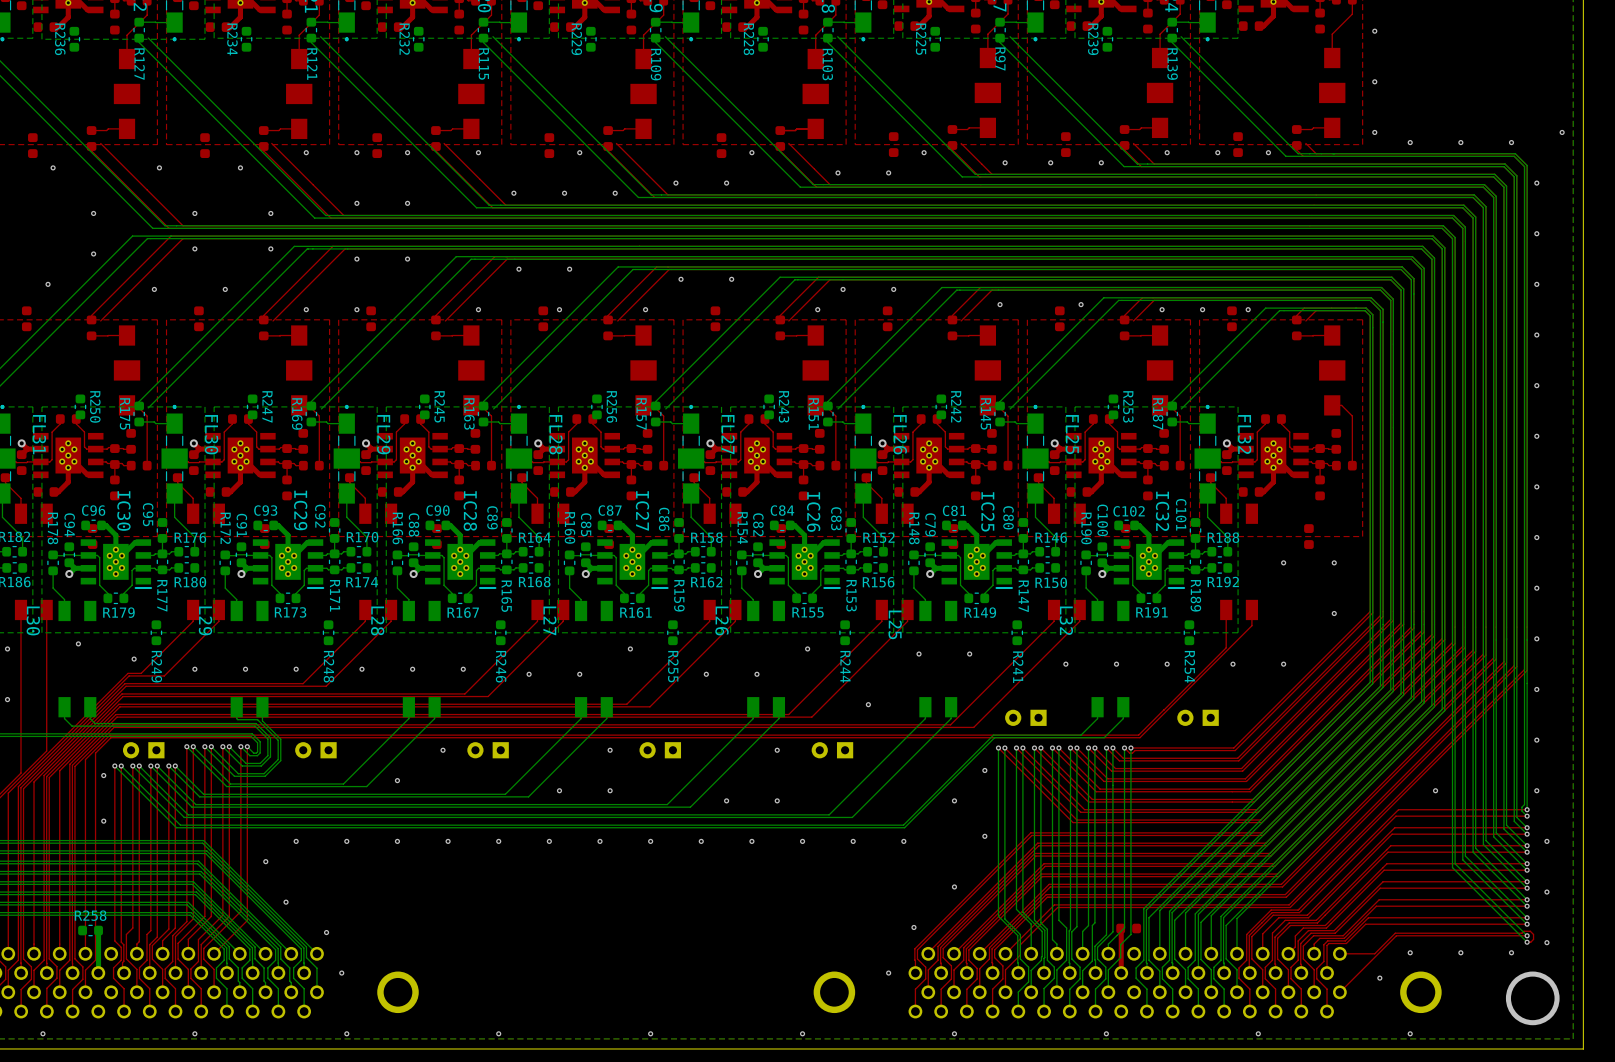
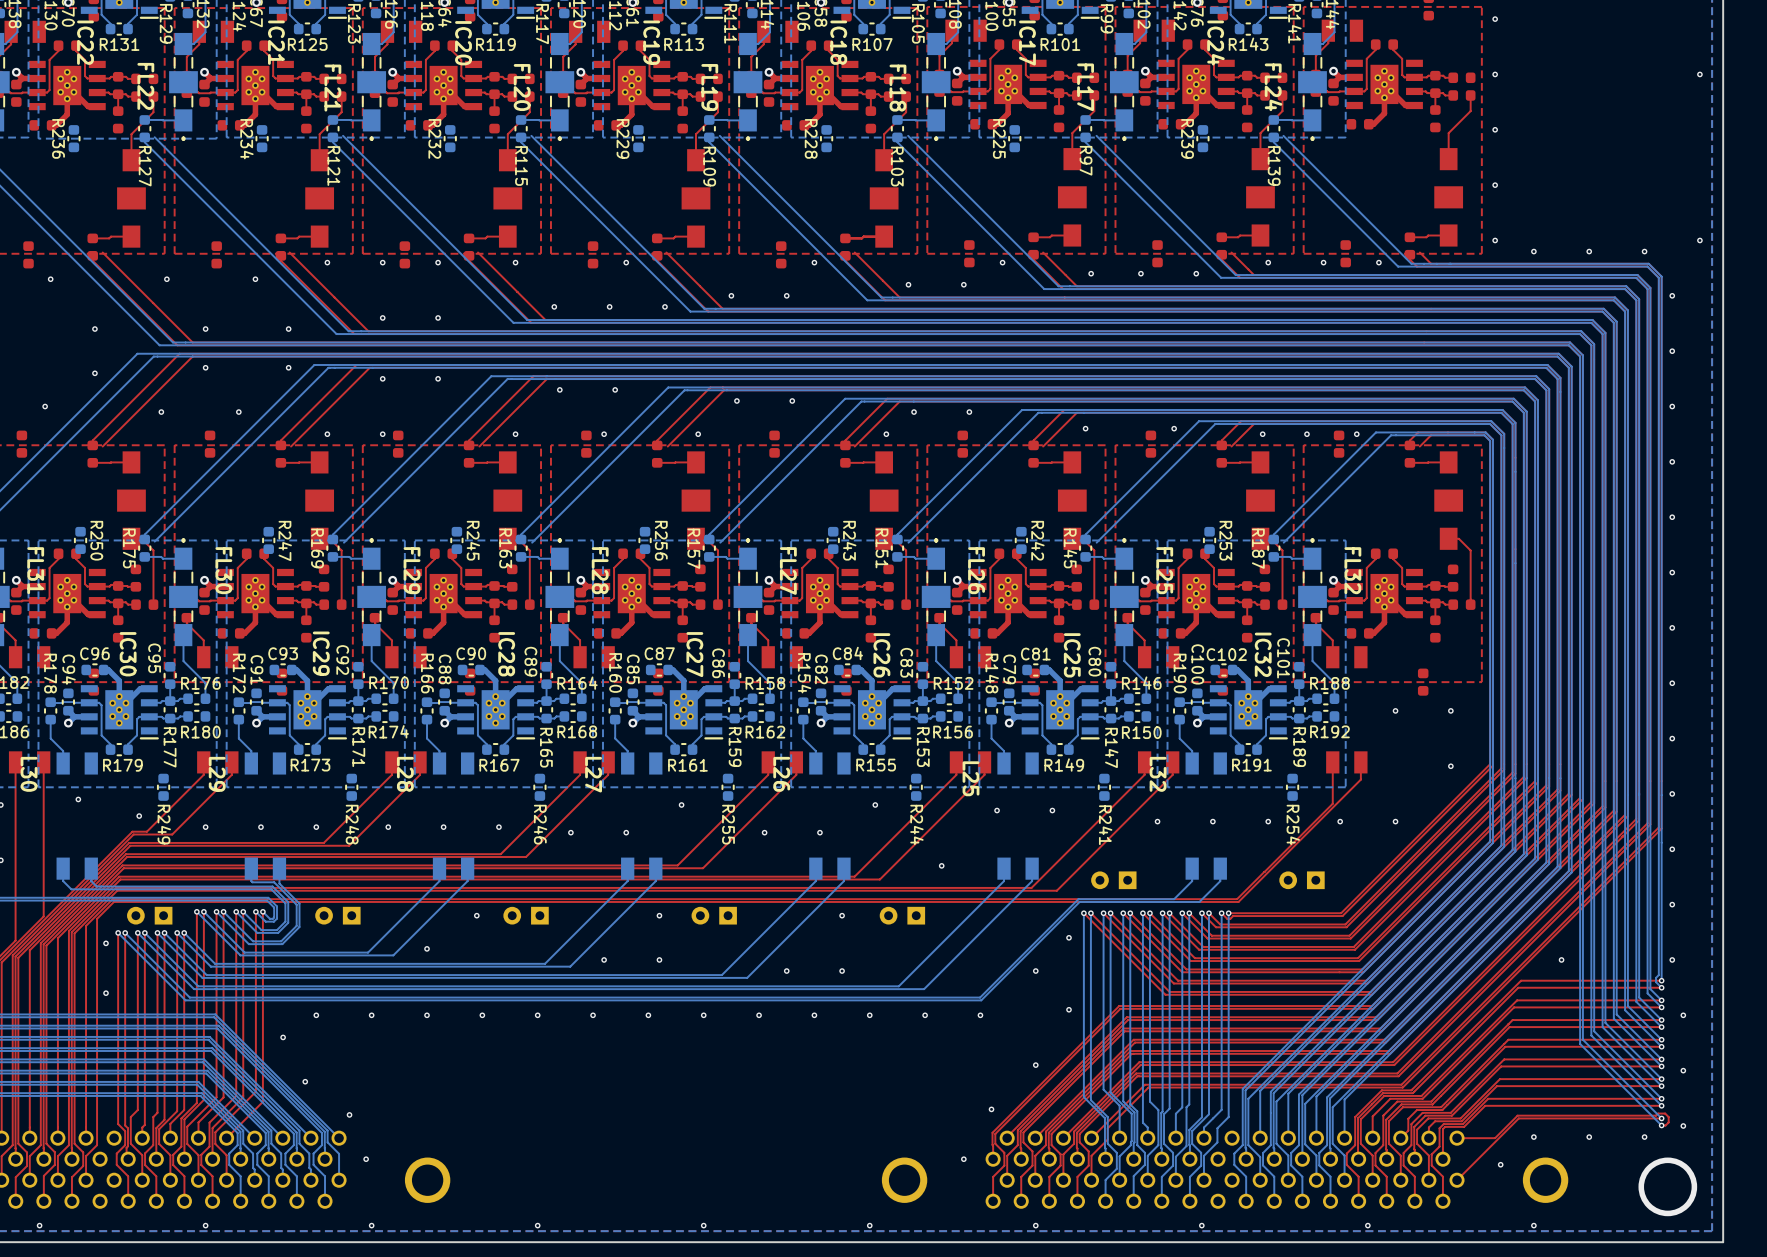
top track: (1120, 928) (1121, 973) -> none
part: (1128, 928) -> none
R258: (90, 930) -> none
bottom track: (98, 930) (98, 973) -> none

